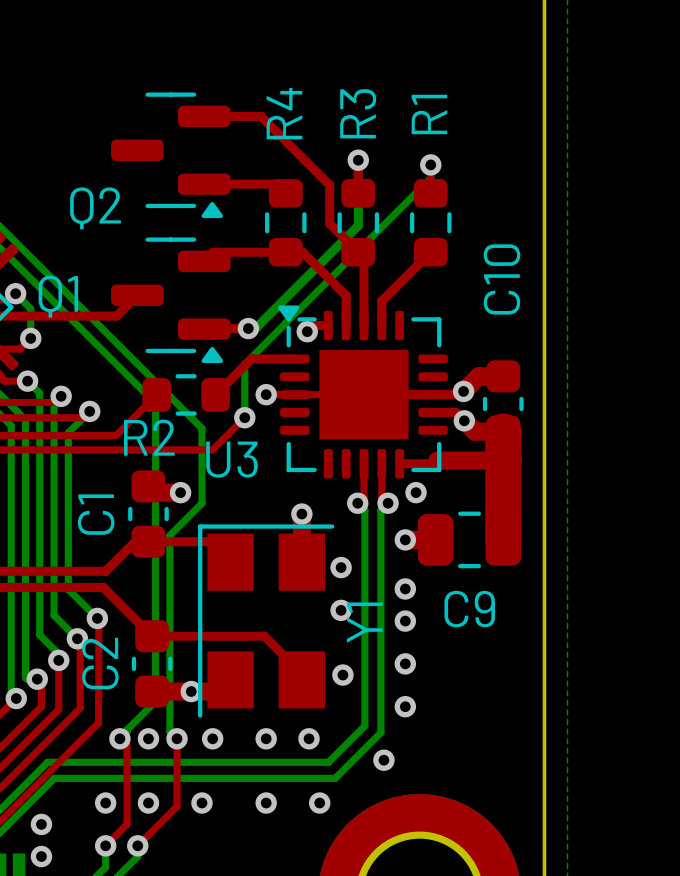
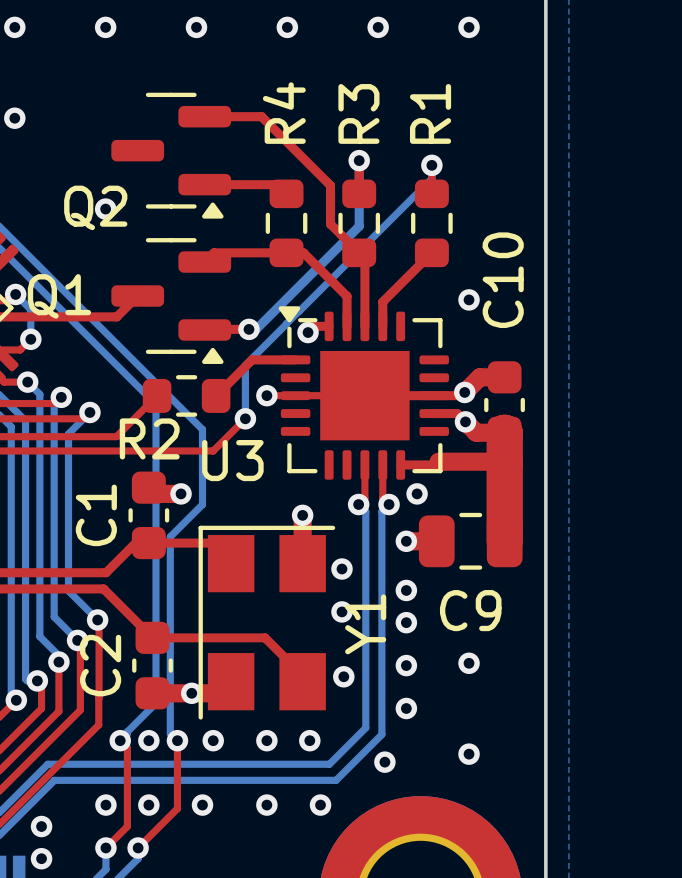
via: none -> (14, 27)
via: none -> (105, 27)
via: none -> (196, 27)
via: none -> (287, 27)
via: none -> (378, 27)
via: none -> (469, 27)
via: none -> (14, 118)
via: none -> (105, 209)
via: none -> (469, 299)
via: none -> (469, 663)
via: none -> (469, 754)

